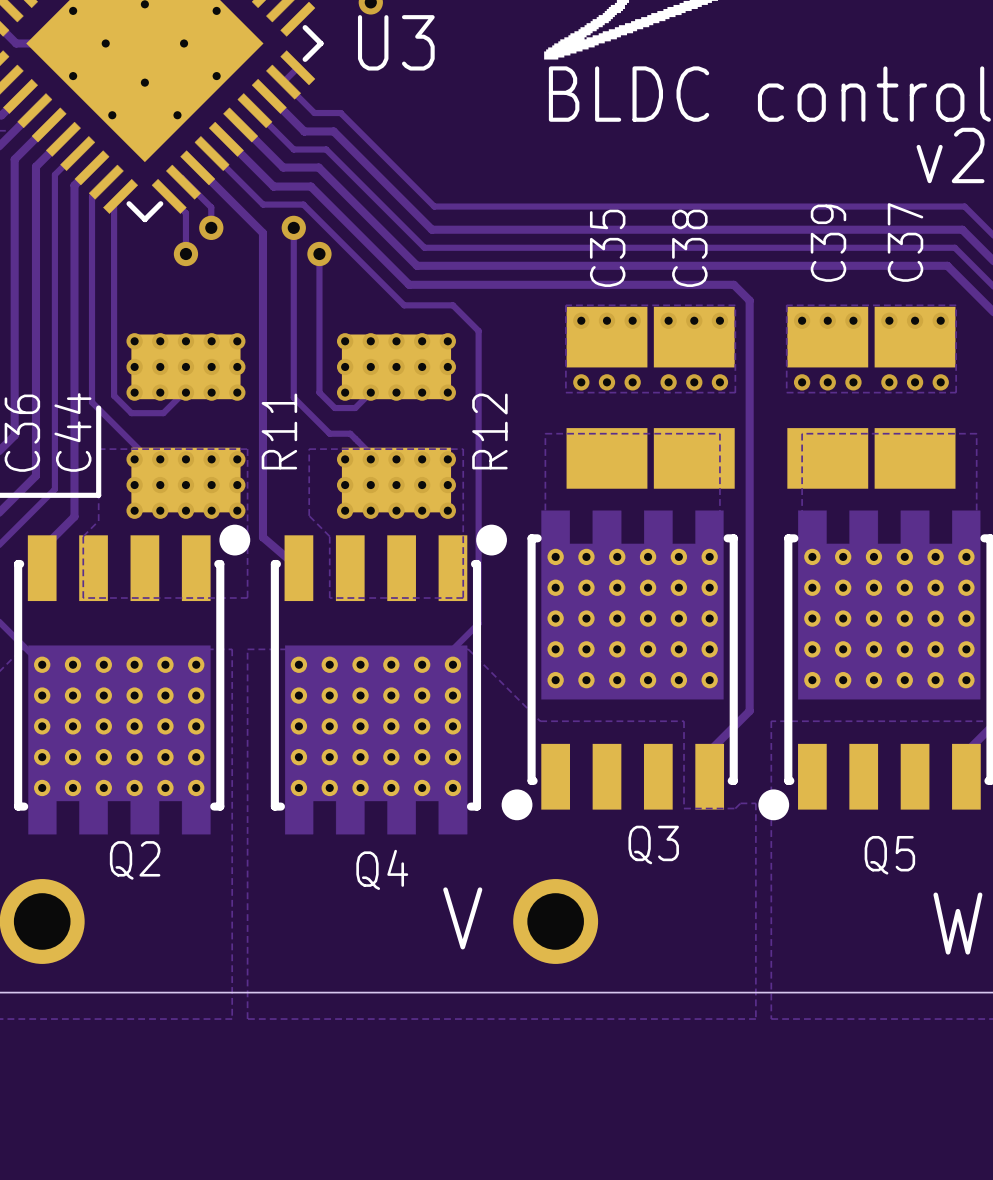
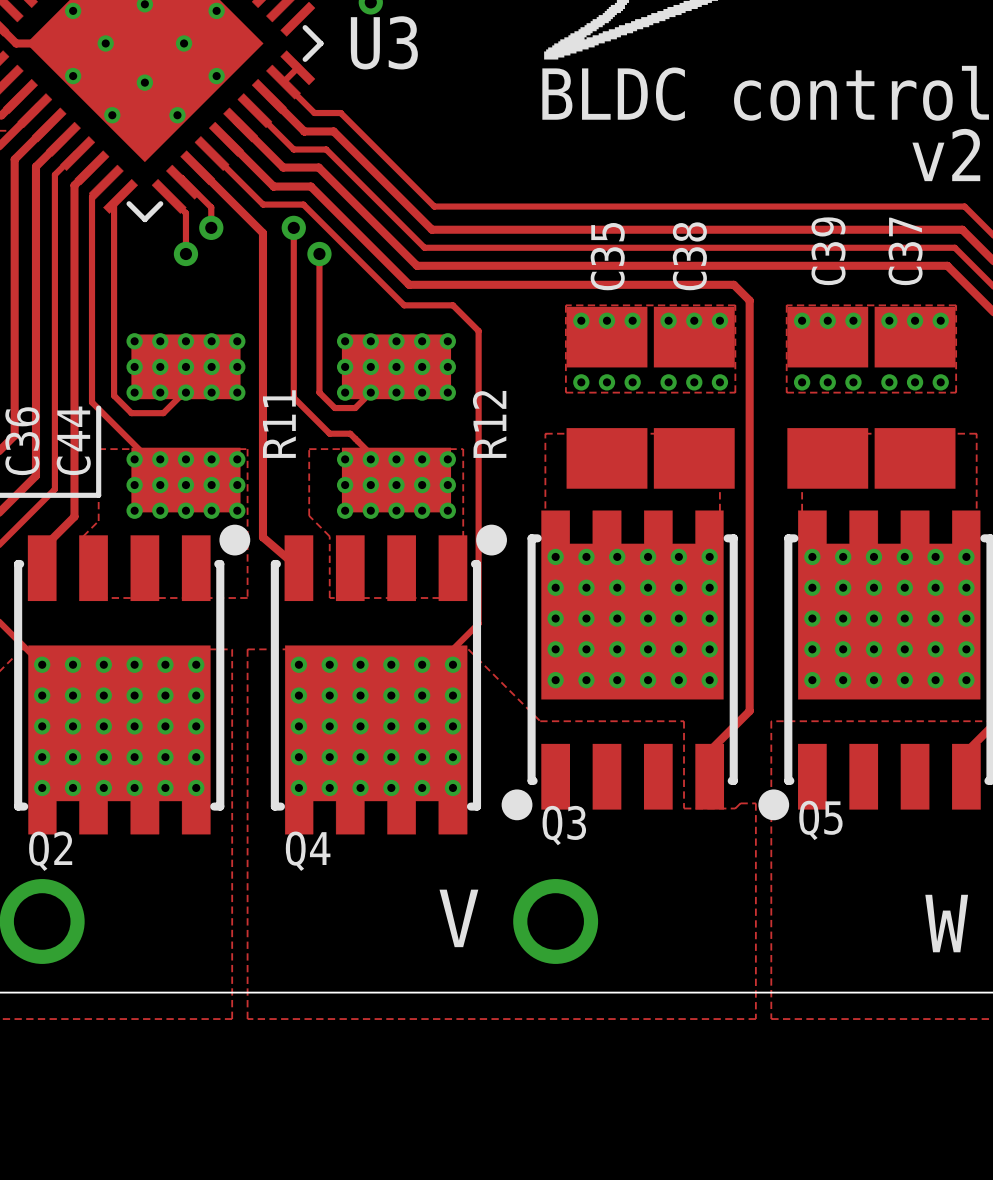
Q3 name position: Q3 (653, 845) -> Q3 (564, 825)
Q5 name position: Q5 (889, 855) -> Q5 (820, 820)
Q2 name position: Q2 (135, 860) -> Q2 (50, 851)
Q4 name position: Q4 (382, 869) -> Q4 (308, 851)

